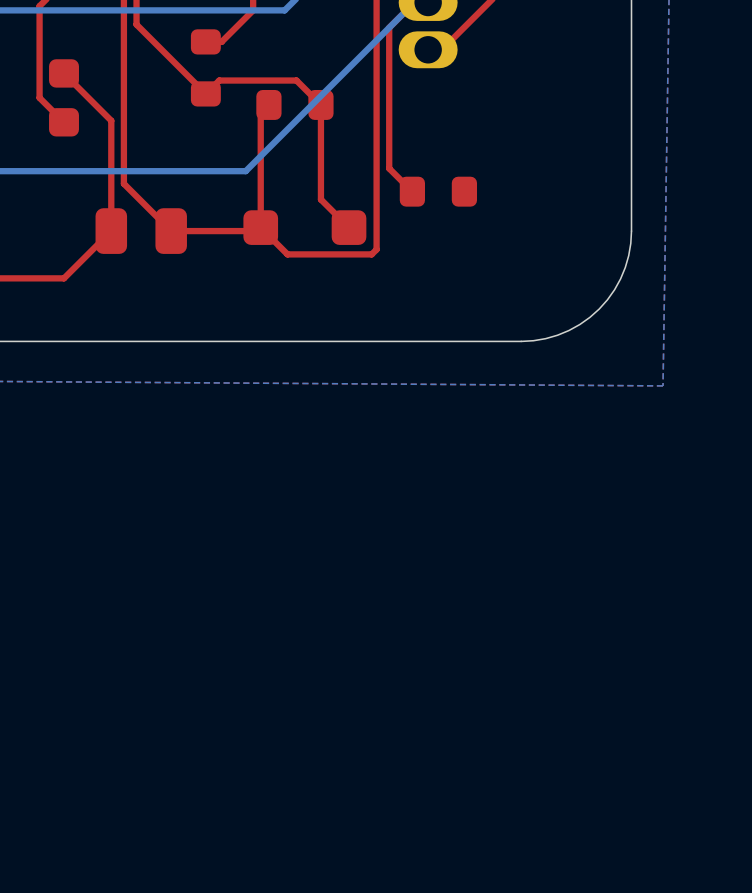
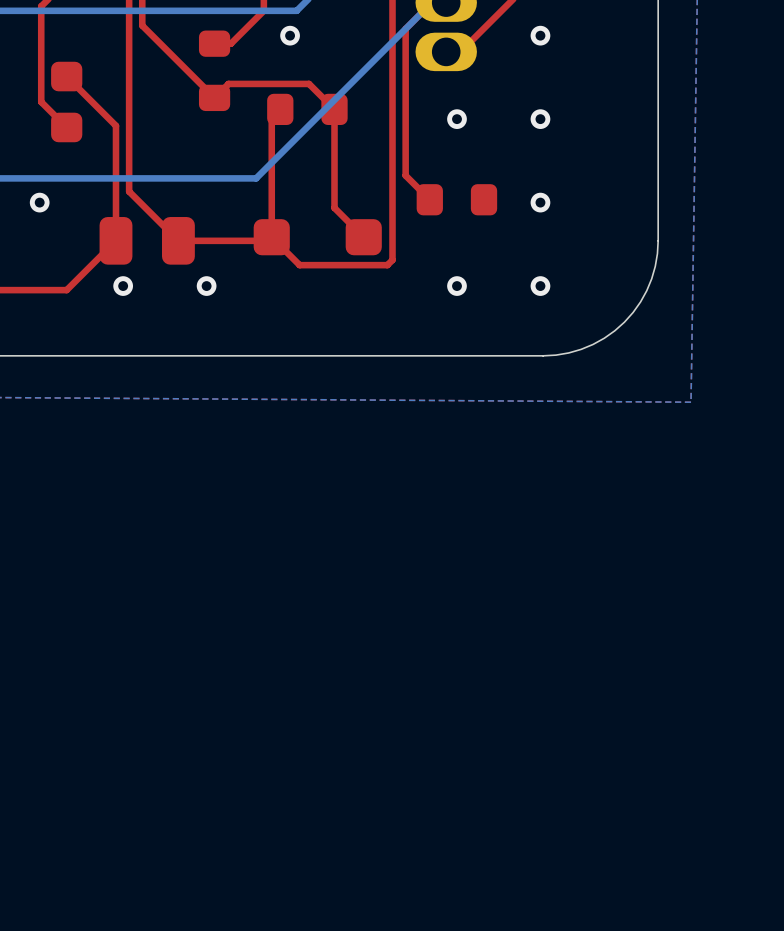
via: none -> (290, 35)
via: none -> (540, 35)
via: none -> (457, 119)
via: none -> (540, 119)
via: none -> (39, 202)
via: none -> (540, 202)
via: none -> (123, 286)
via: none -> (206, 286)
via: none -> (457, 286)
via: none -> (540, 286)

